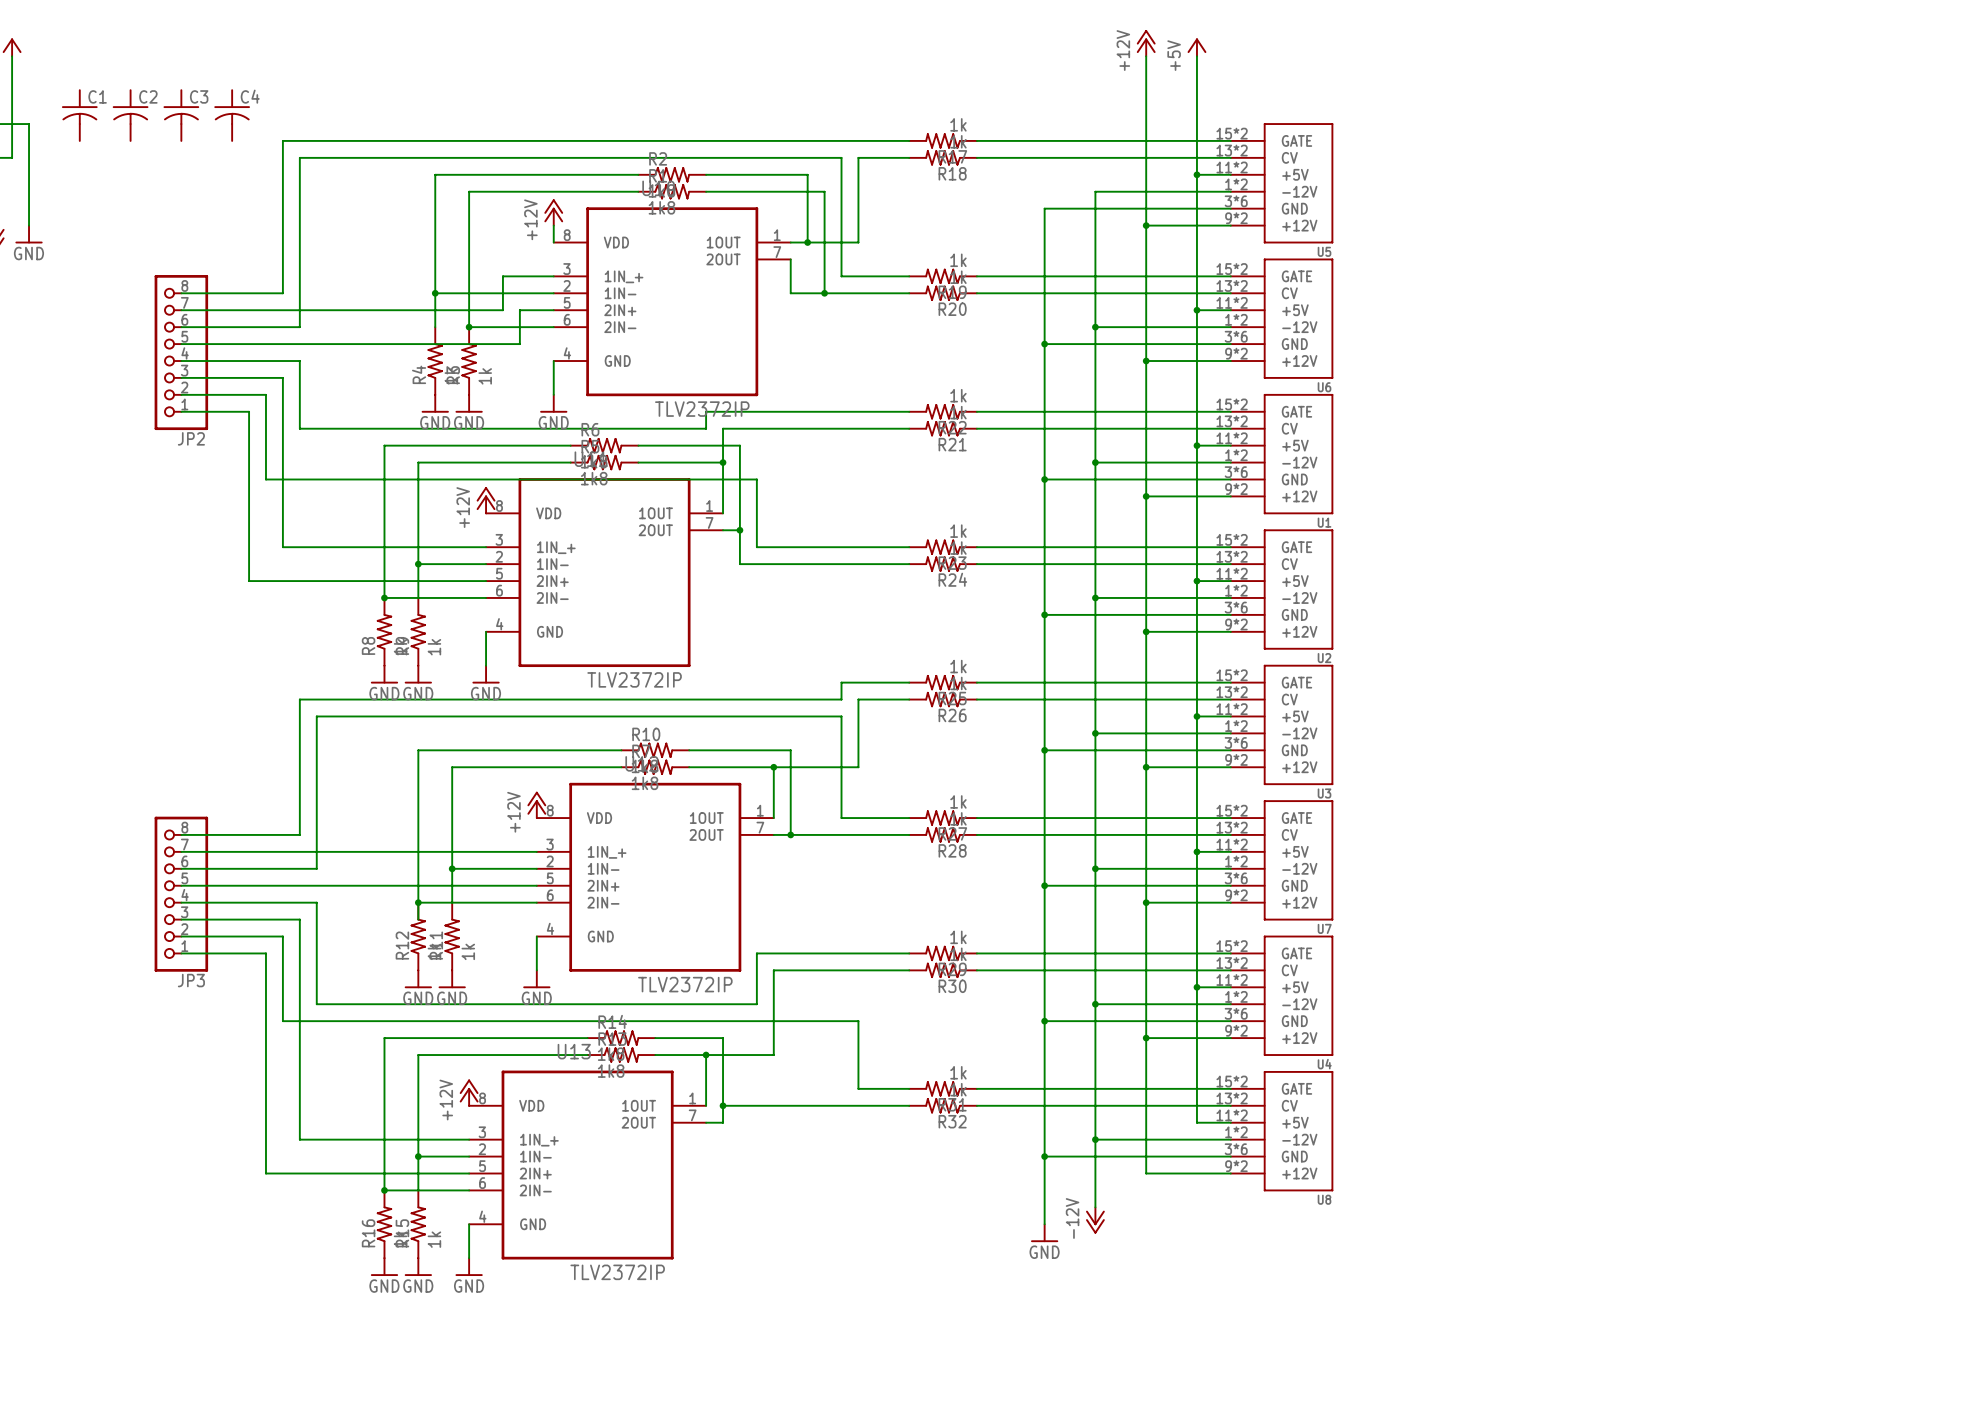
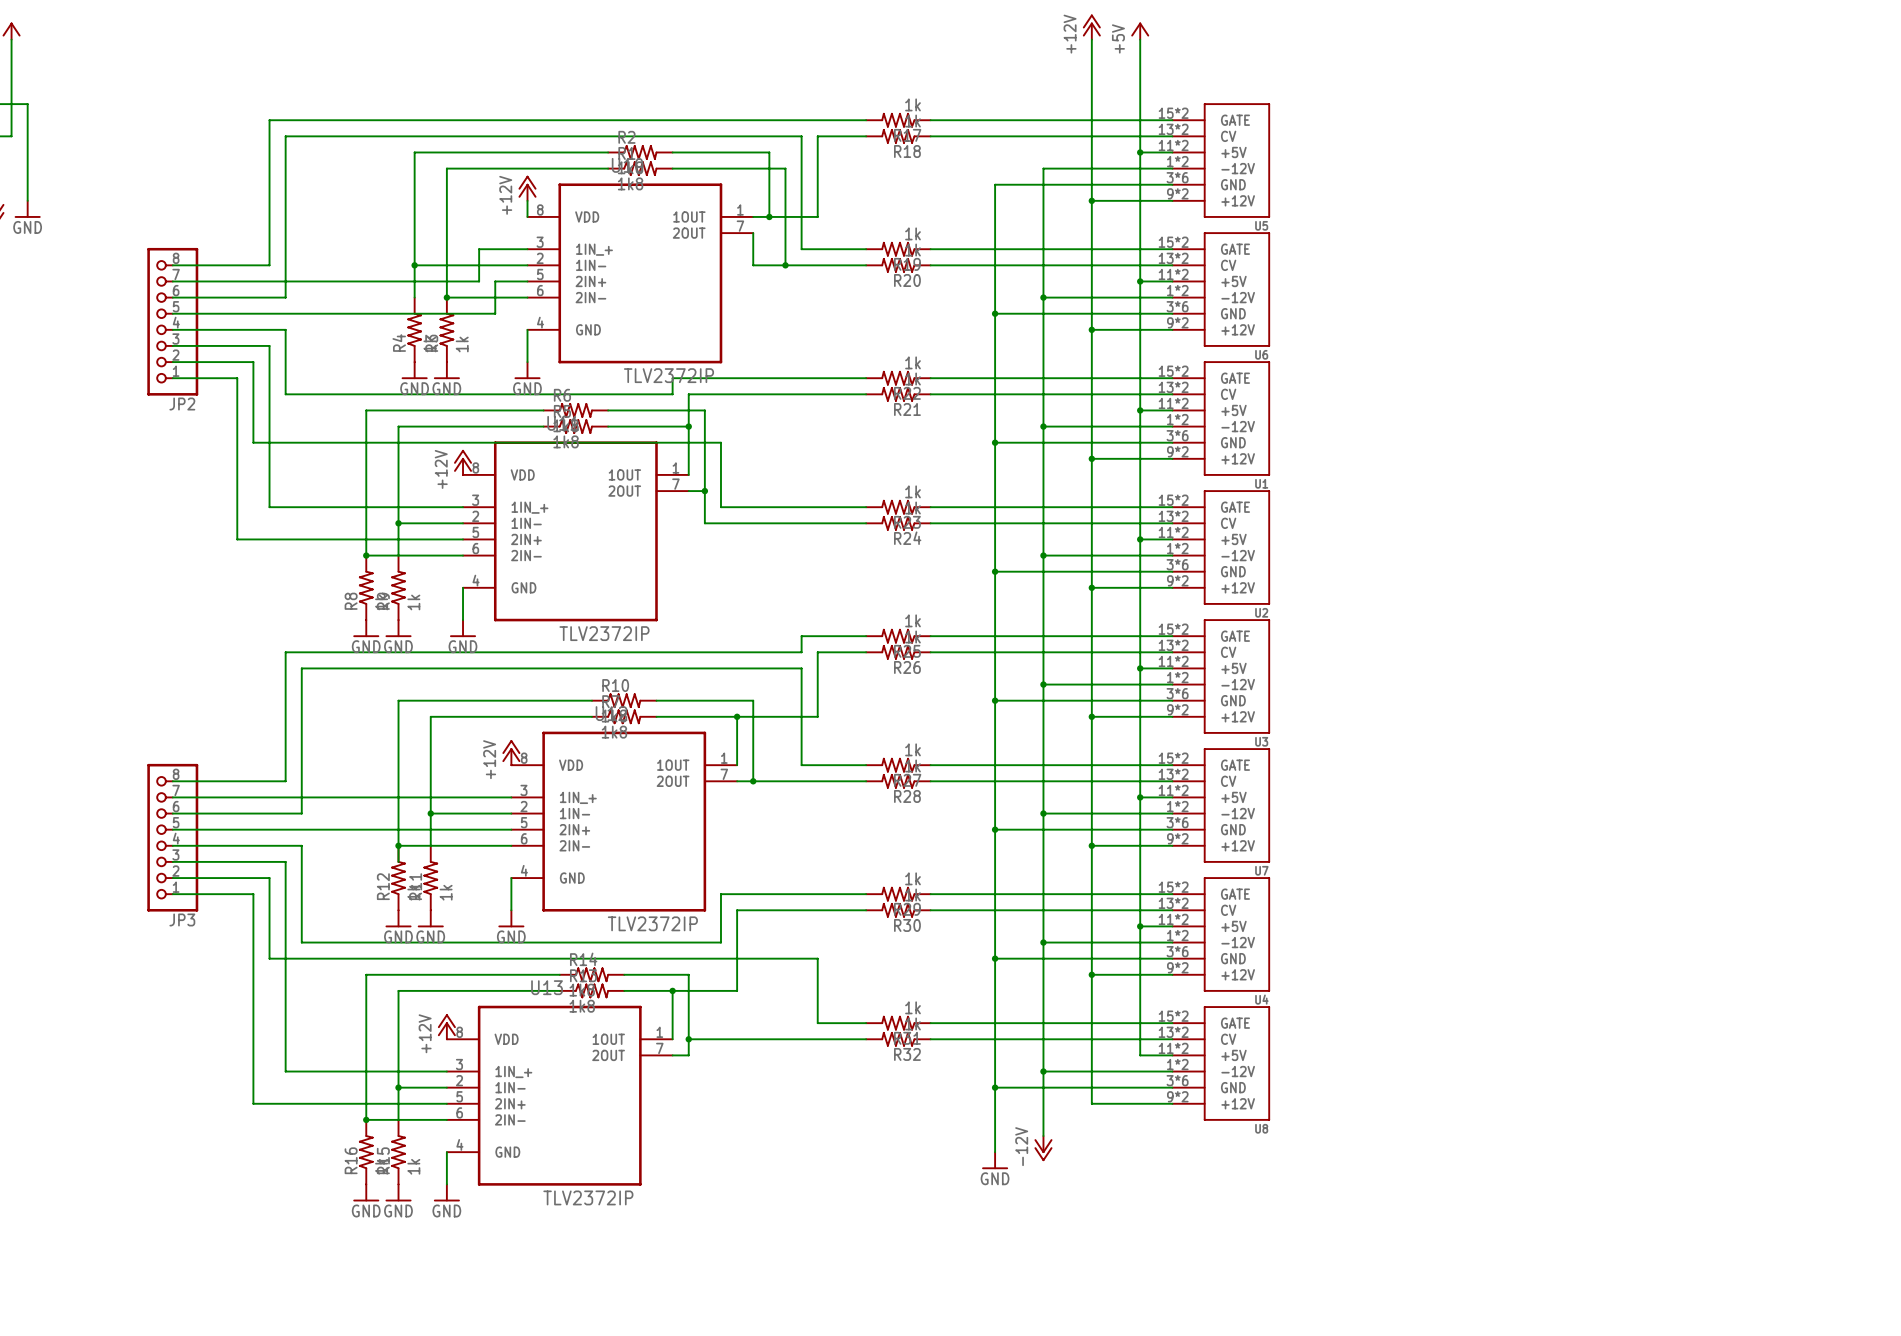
C1: (79, 115) -> none
C2: (130, 115) -> none
C3: (181, 115) -> none
C4: (232, 115) -> none

